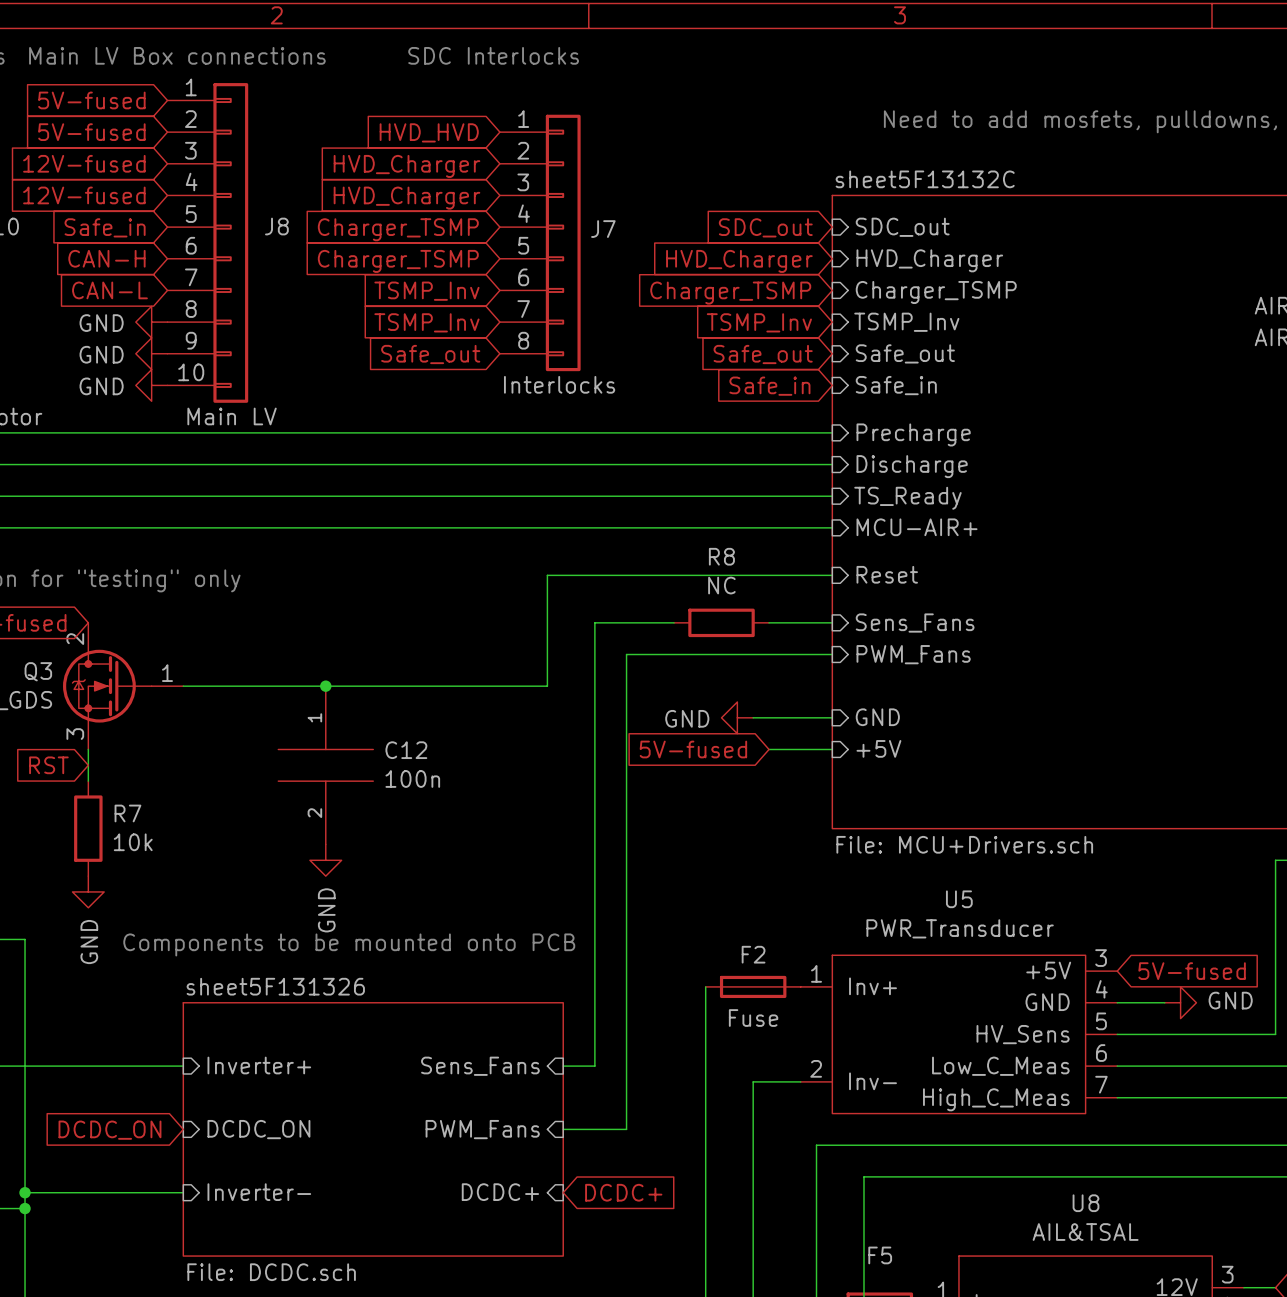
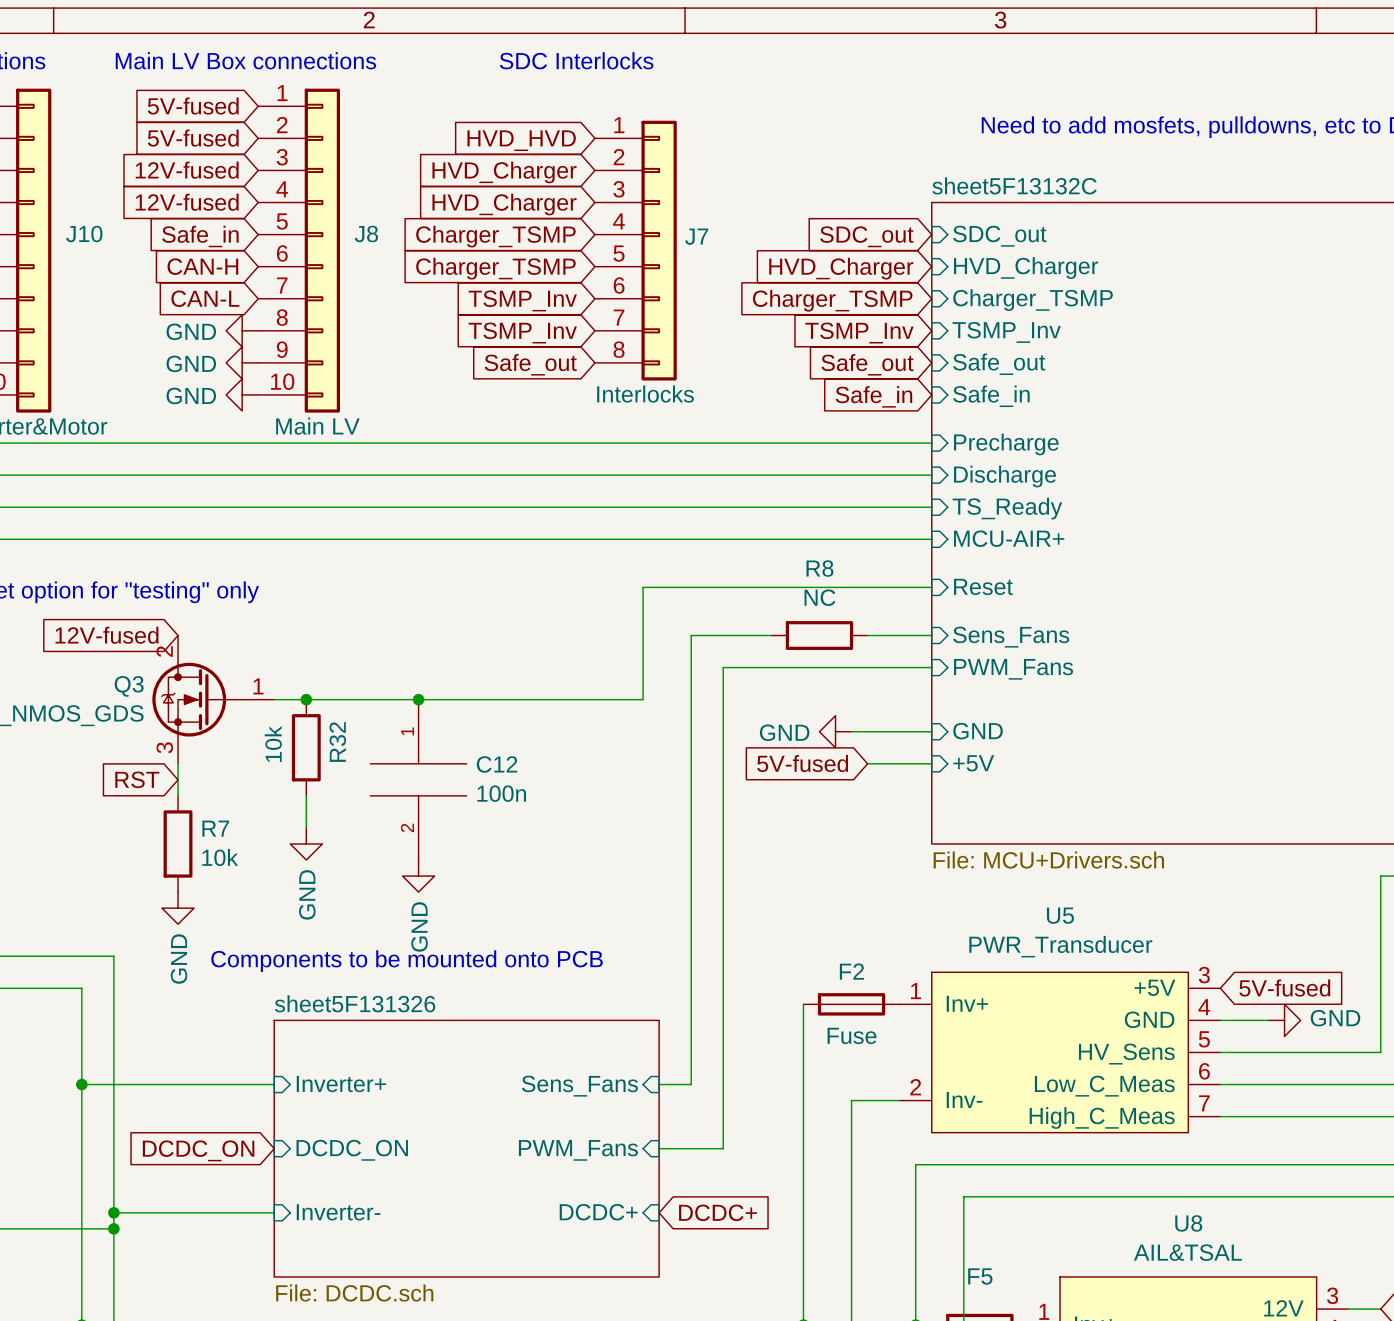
junction: none -> (306, 699)
R32: none -> 10k (306, 747)
wire: none -> (306, 795) (306, 827)
power symbol: none -> GND (306, 843)

